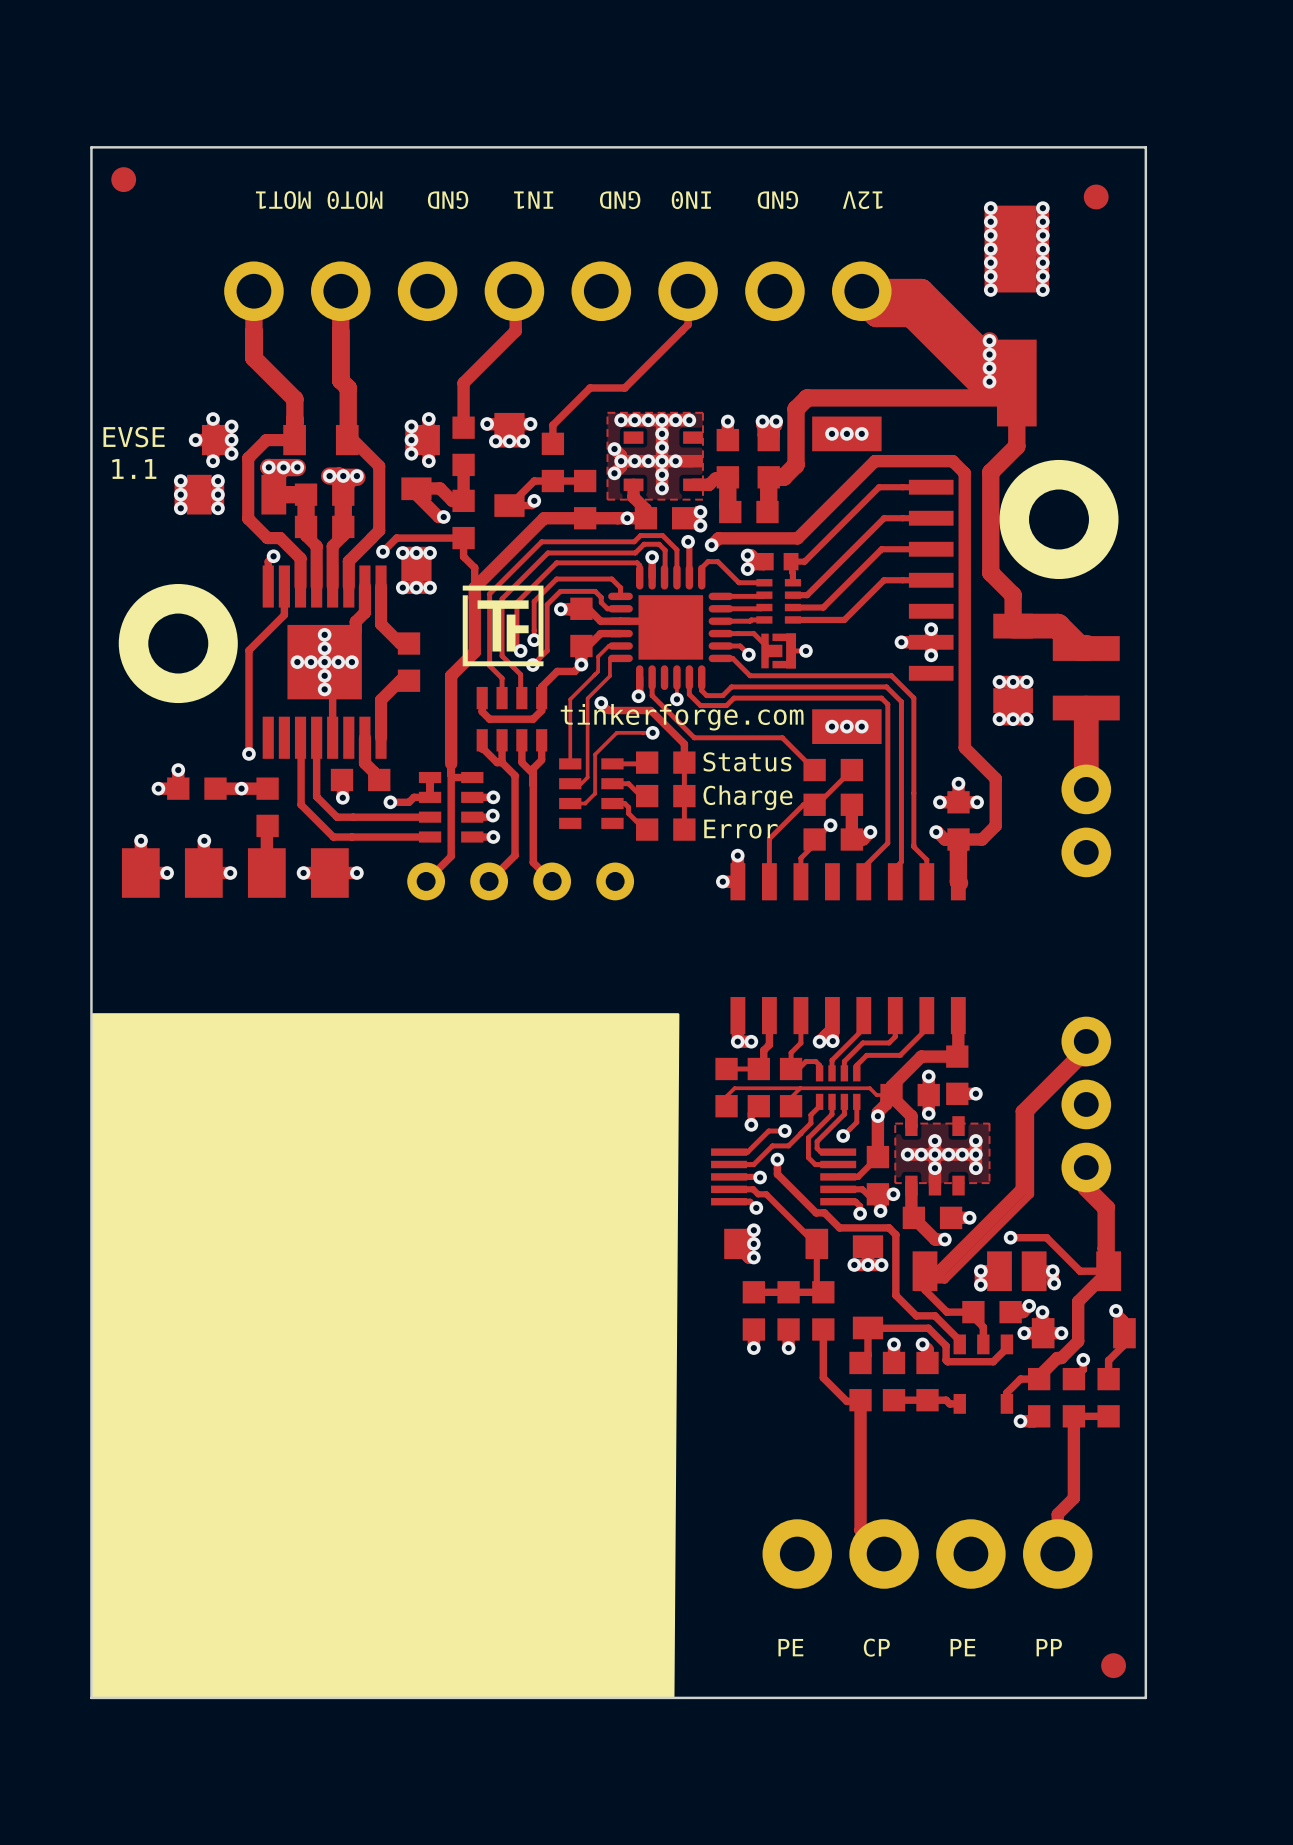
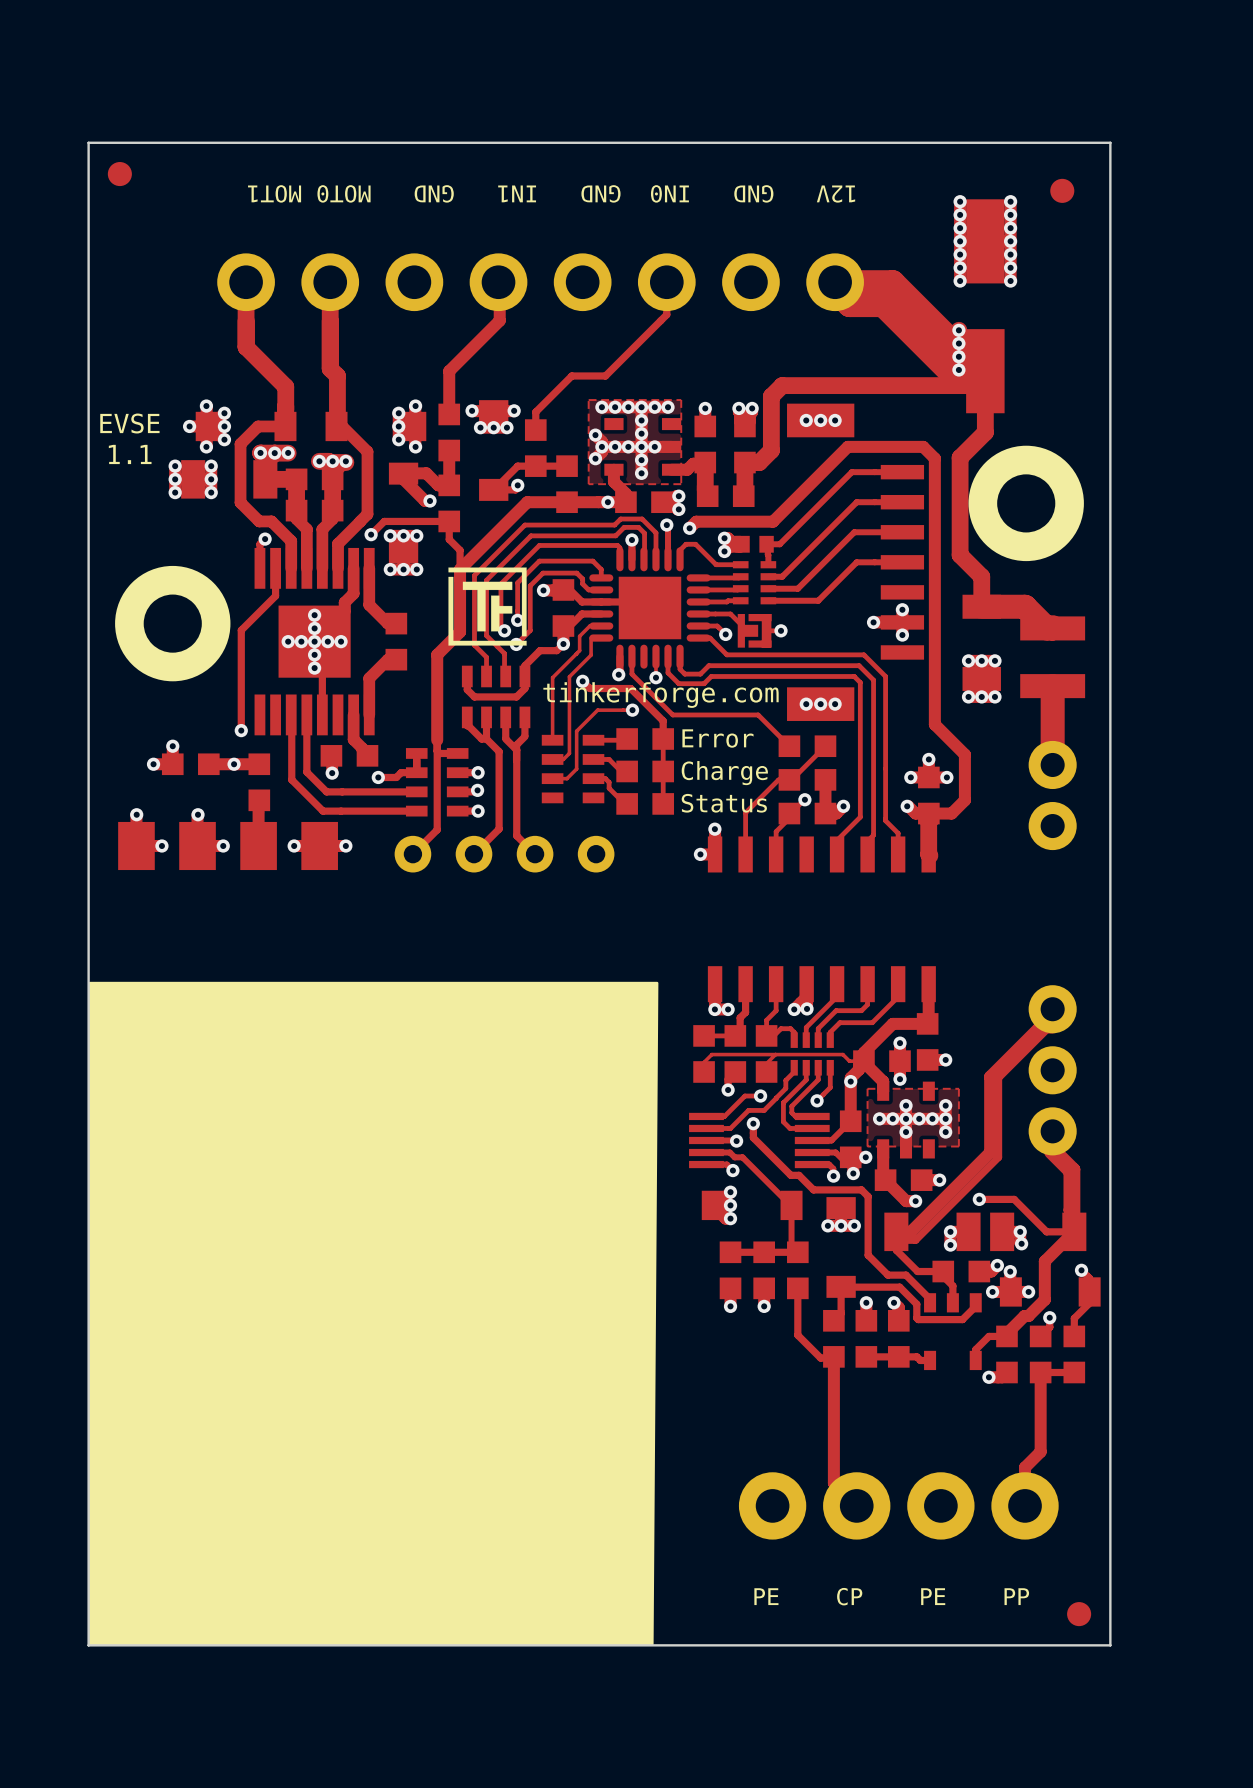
text: Status (747, 761) -> Error (717, 738)
text: Error (740, 829) -> Status (724, 803)

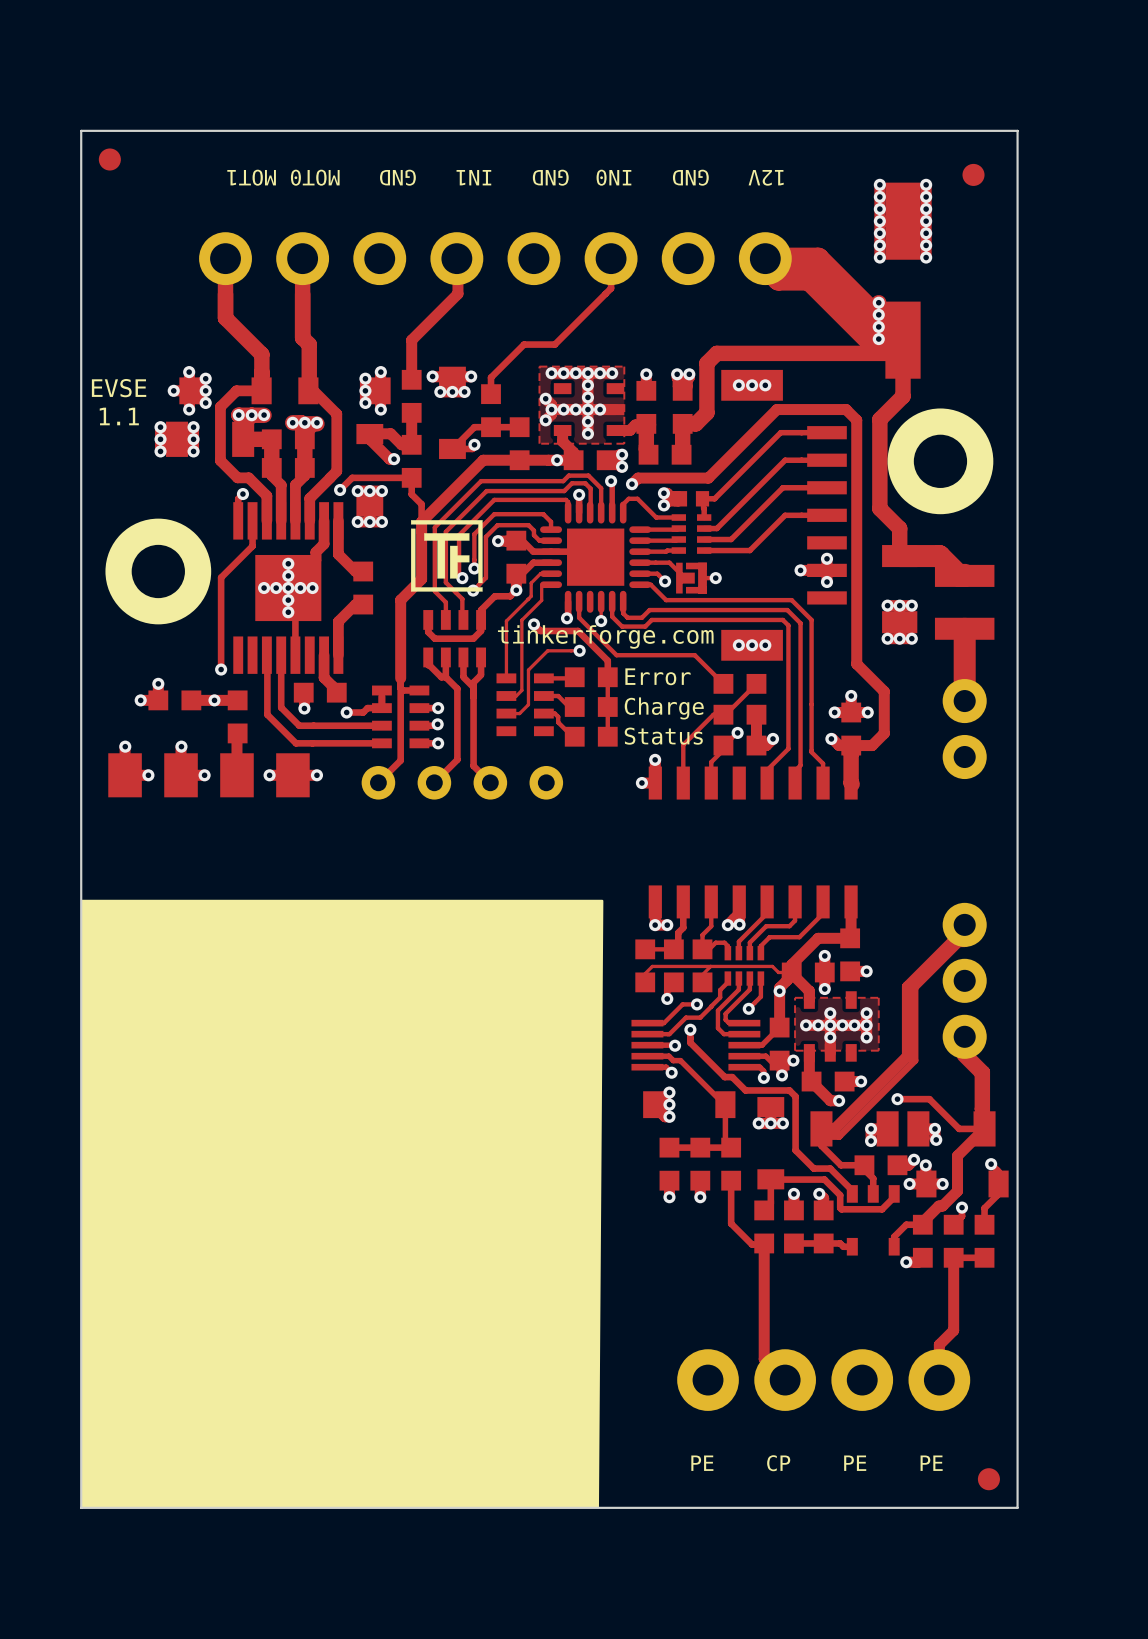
text: PE CP PE PP (891, 1596) -> PE CP PE PE (816, 1463)

